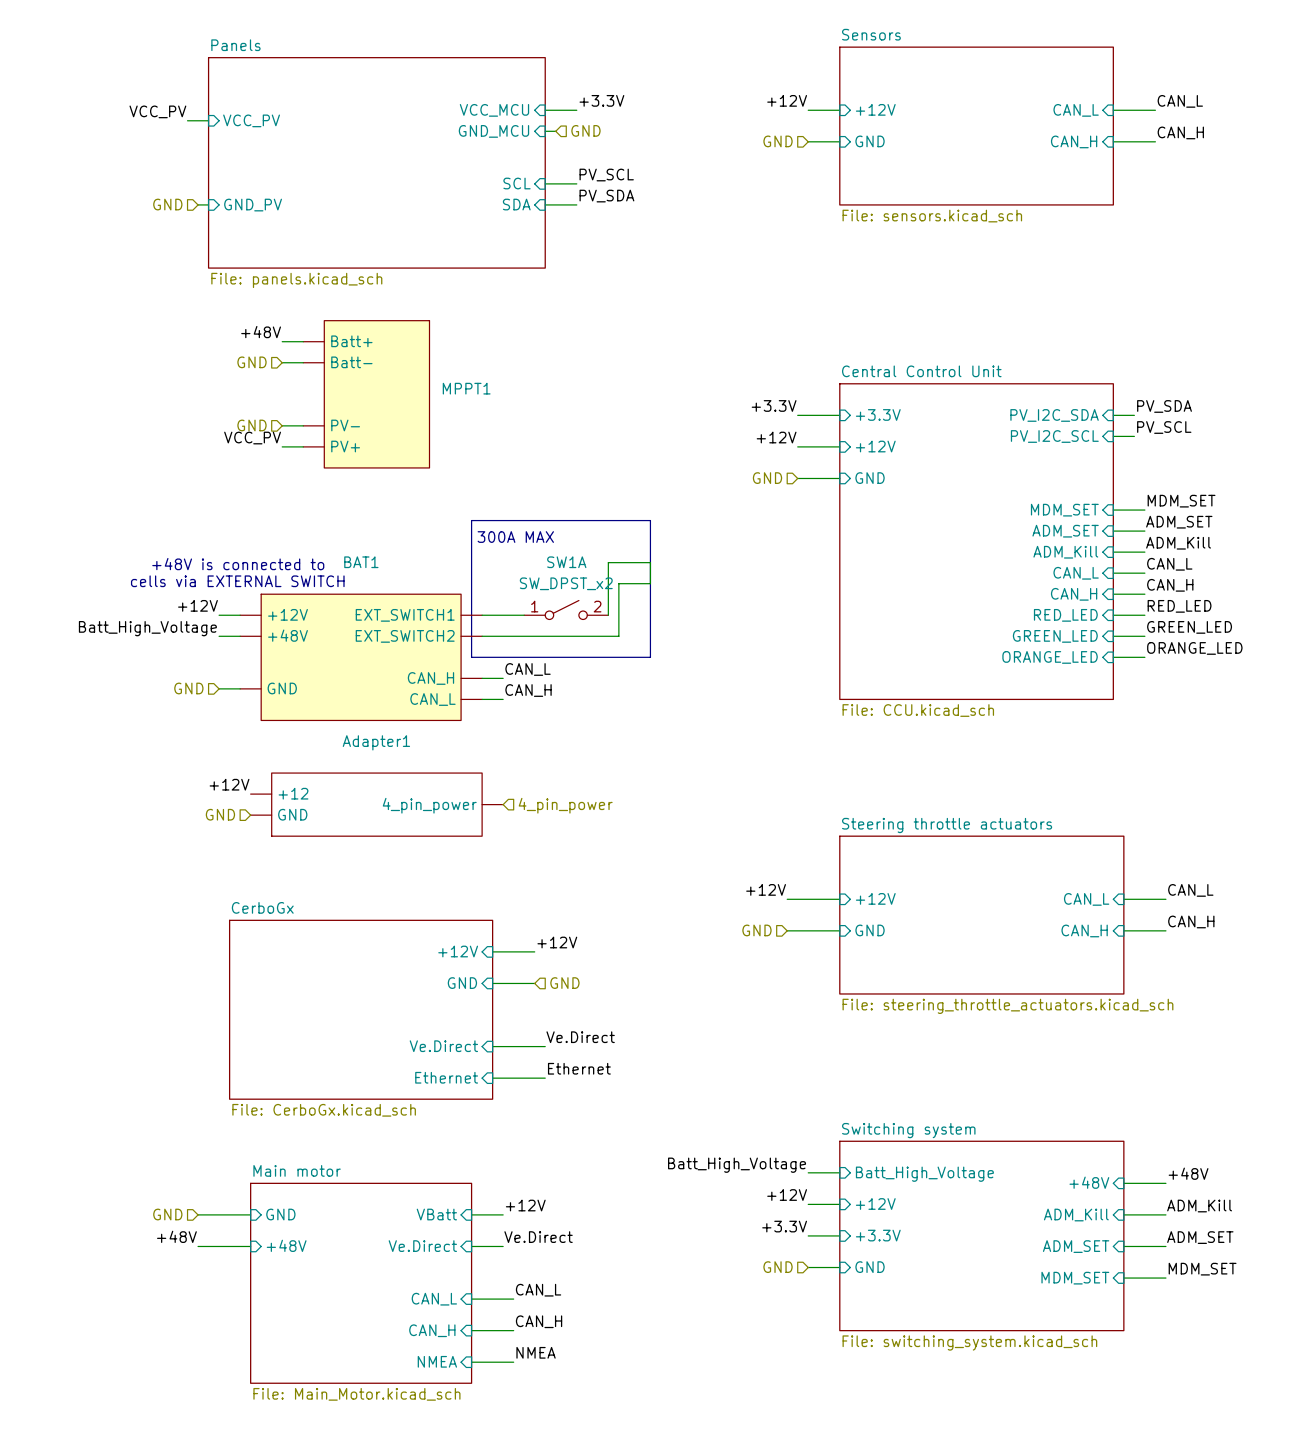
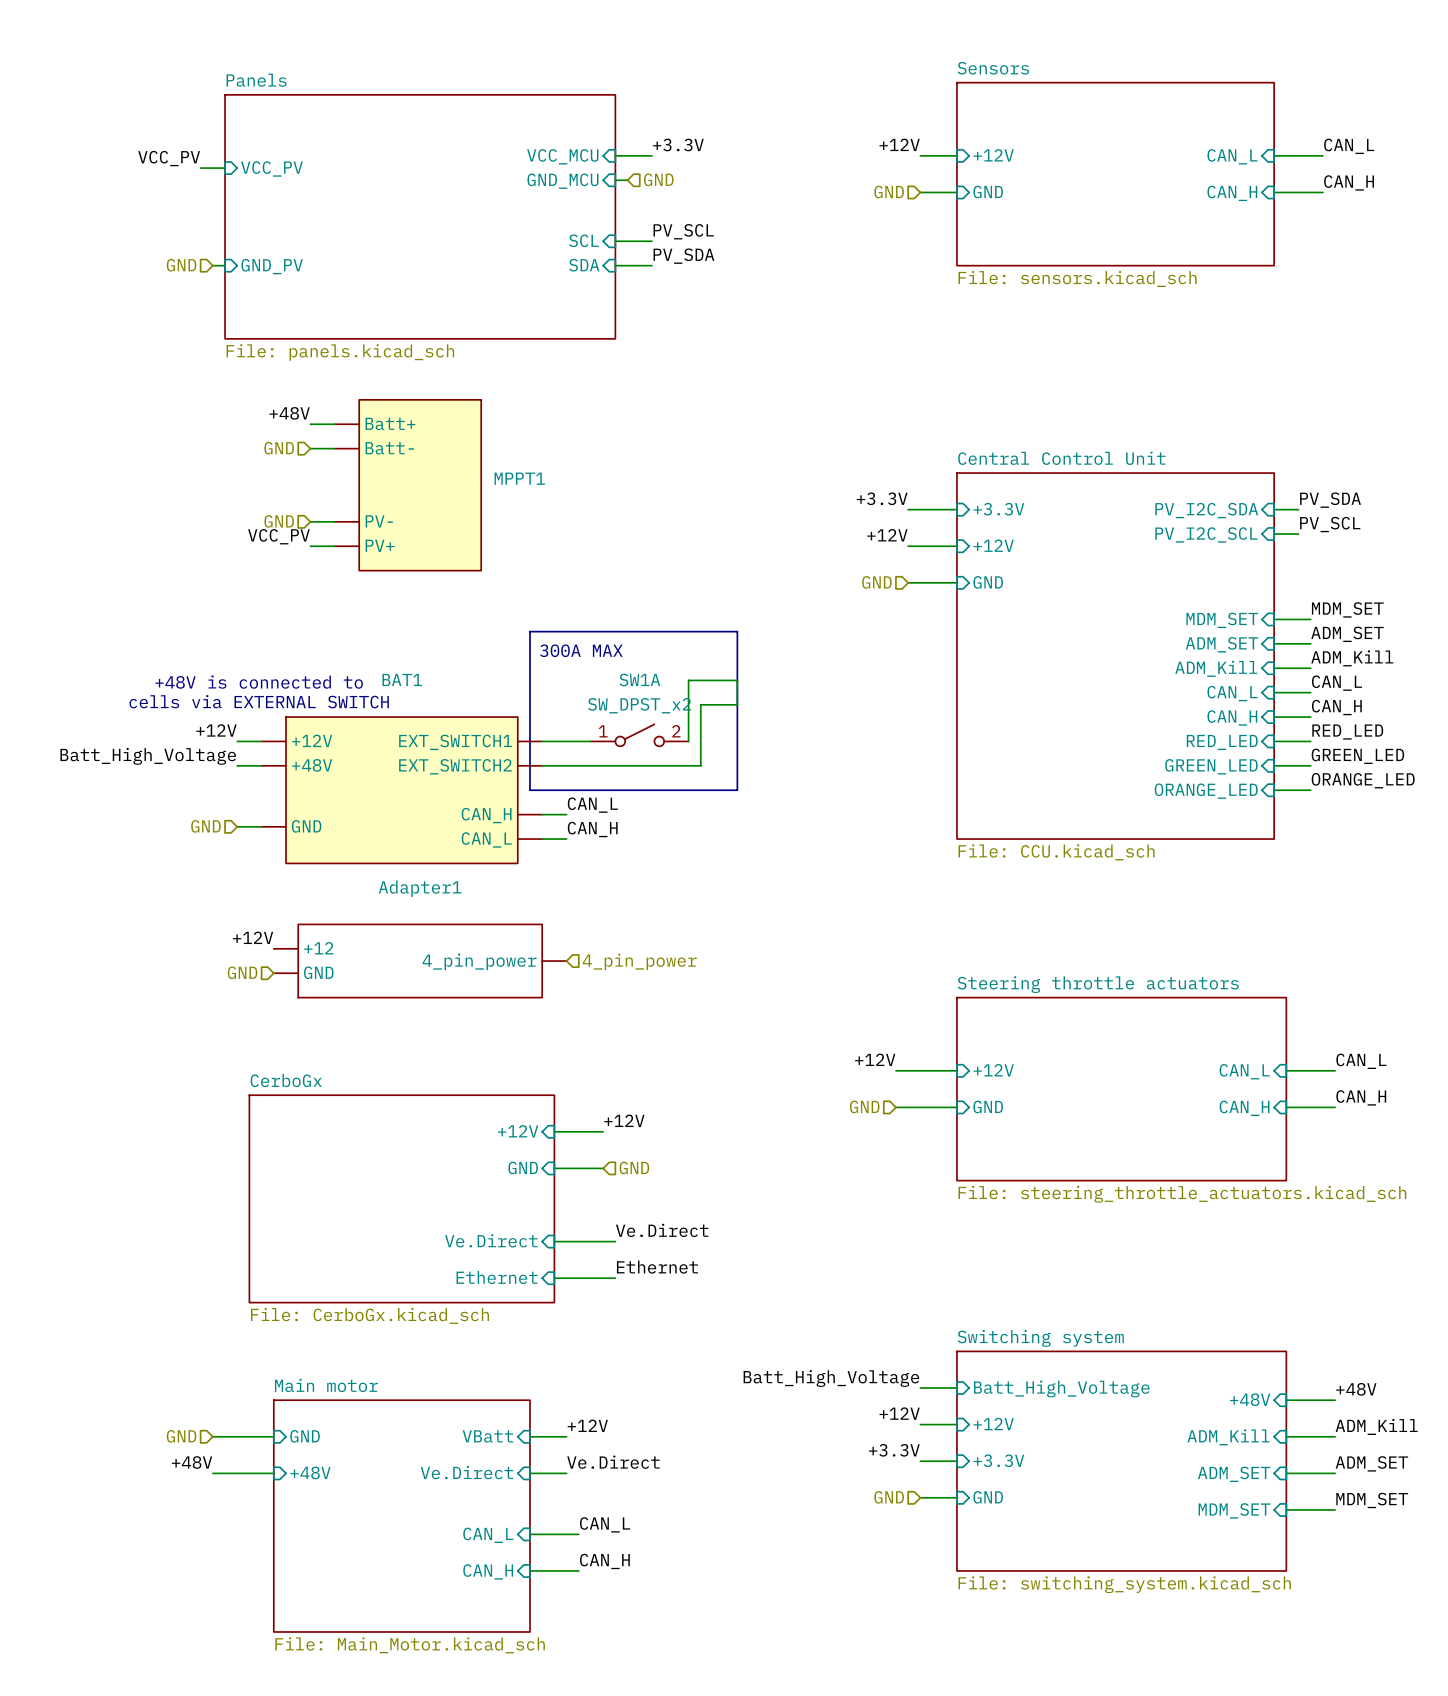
label: NMEA (536, 1352) -> none
sheet pin: NMEA (437, 1361) -> none
wire: (471, 1362) (513, 1362) -> none

